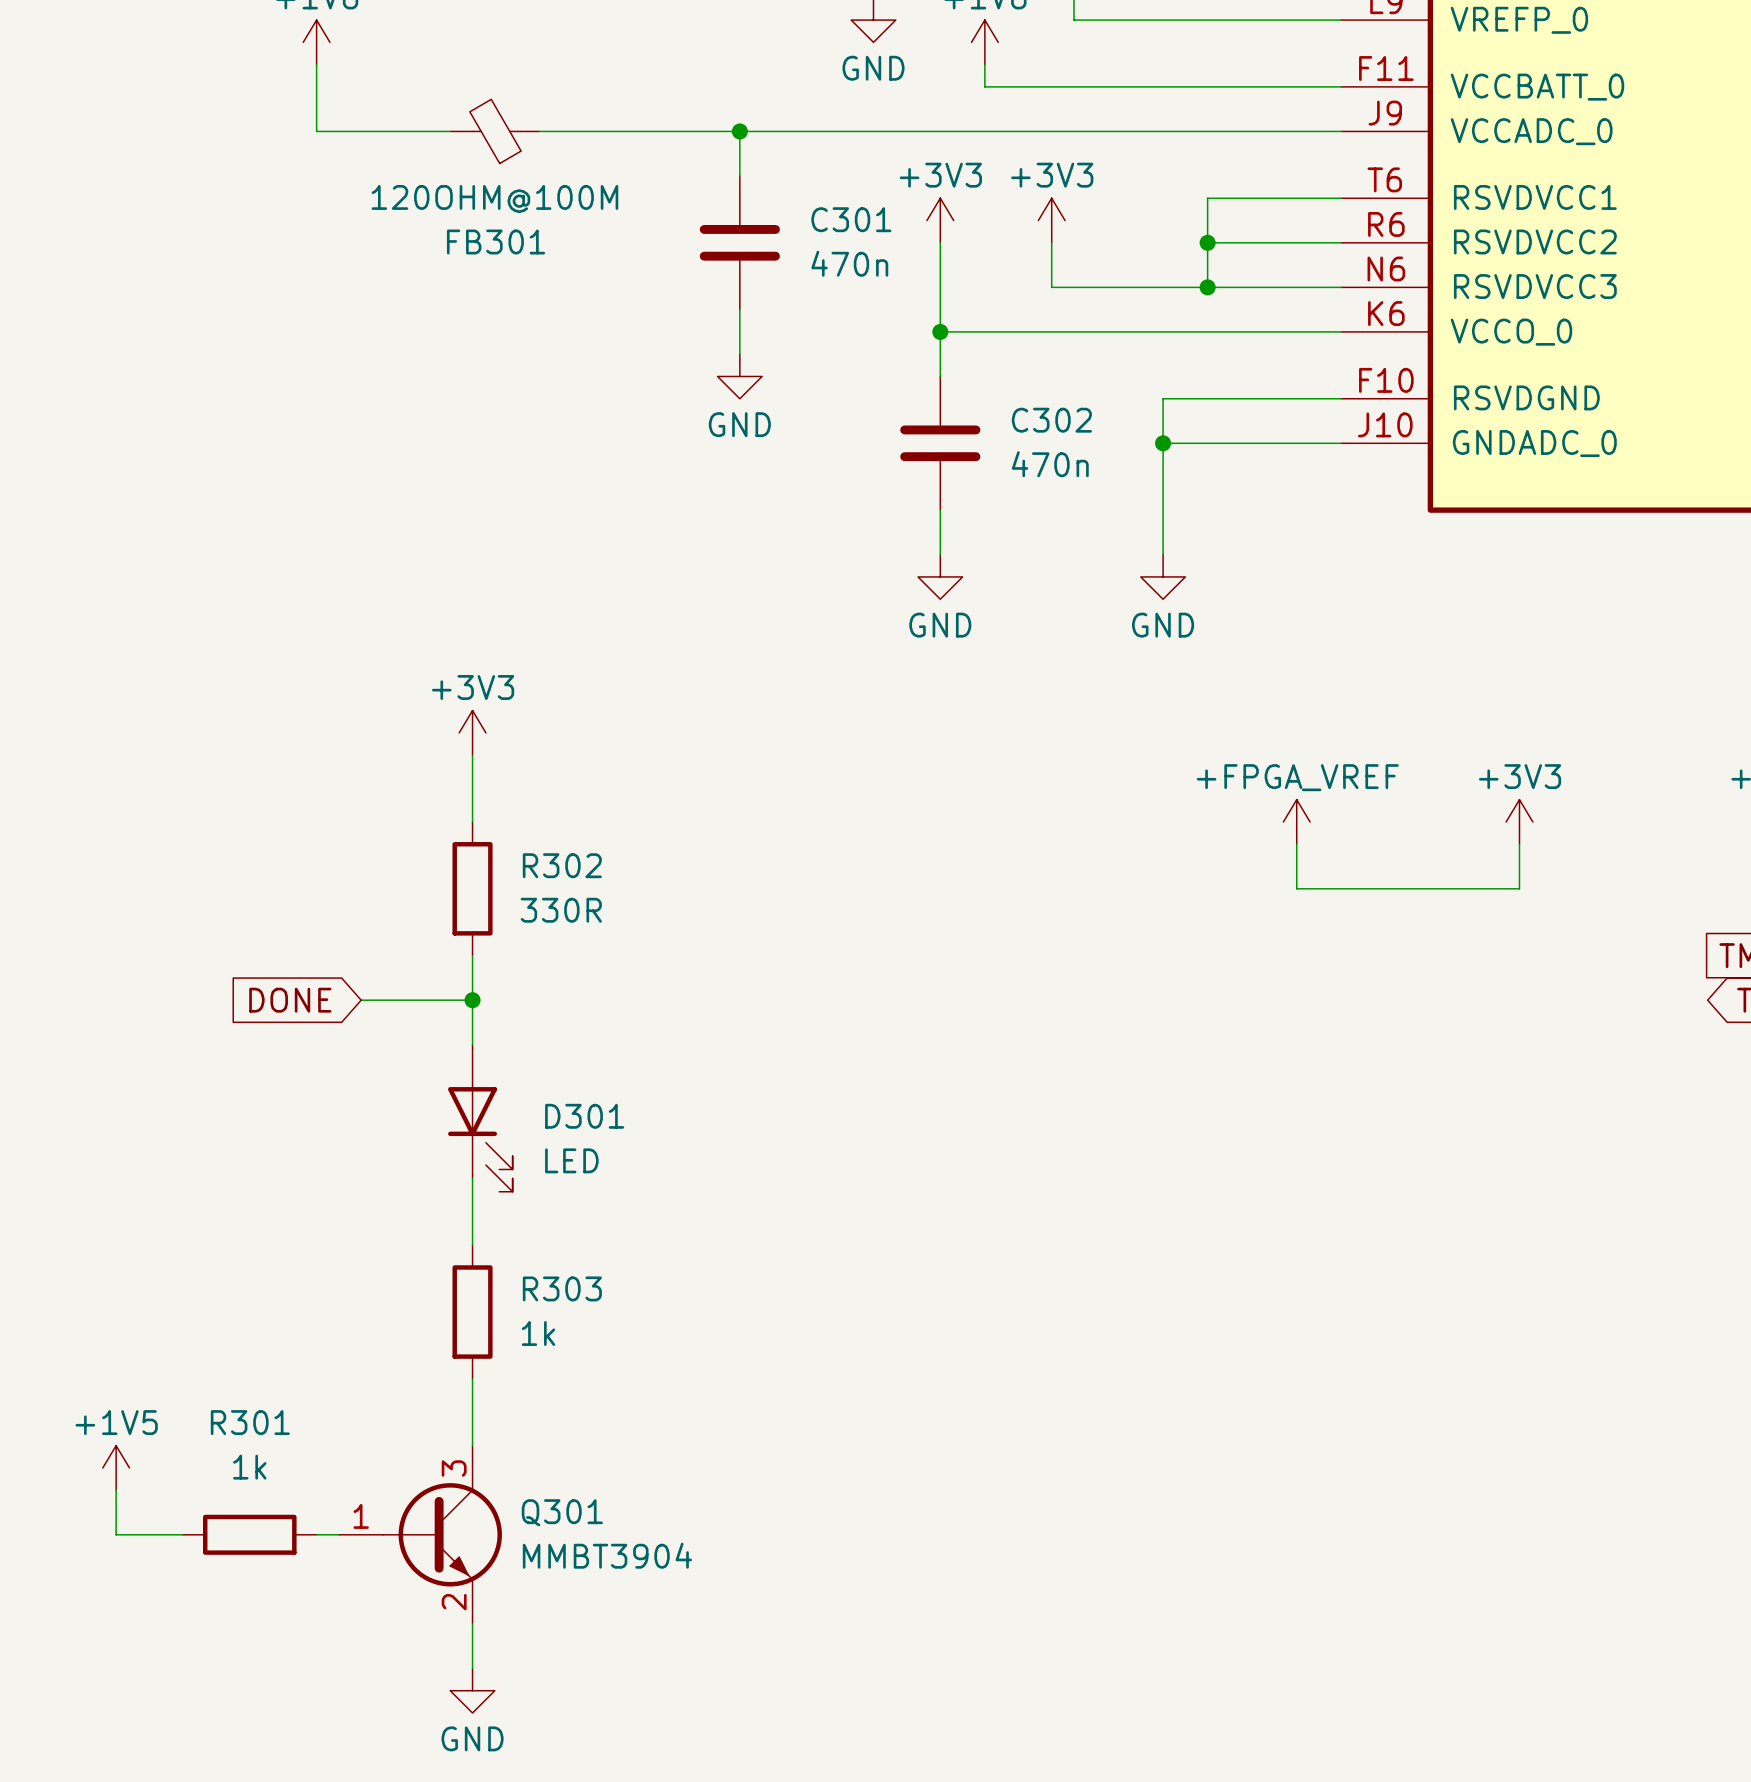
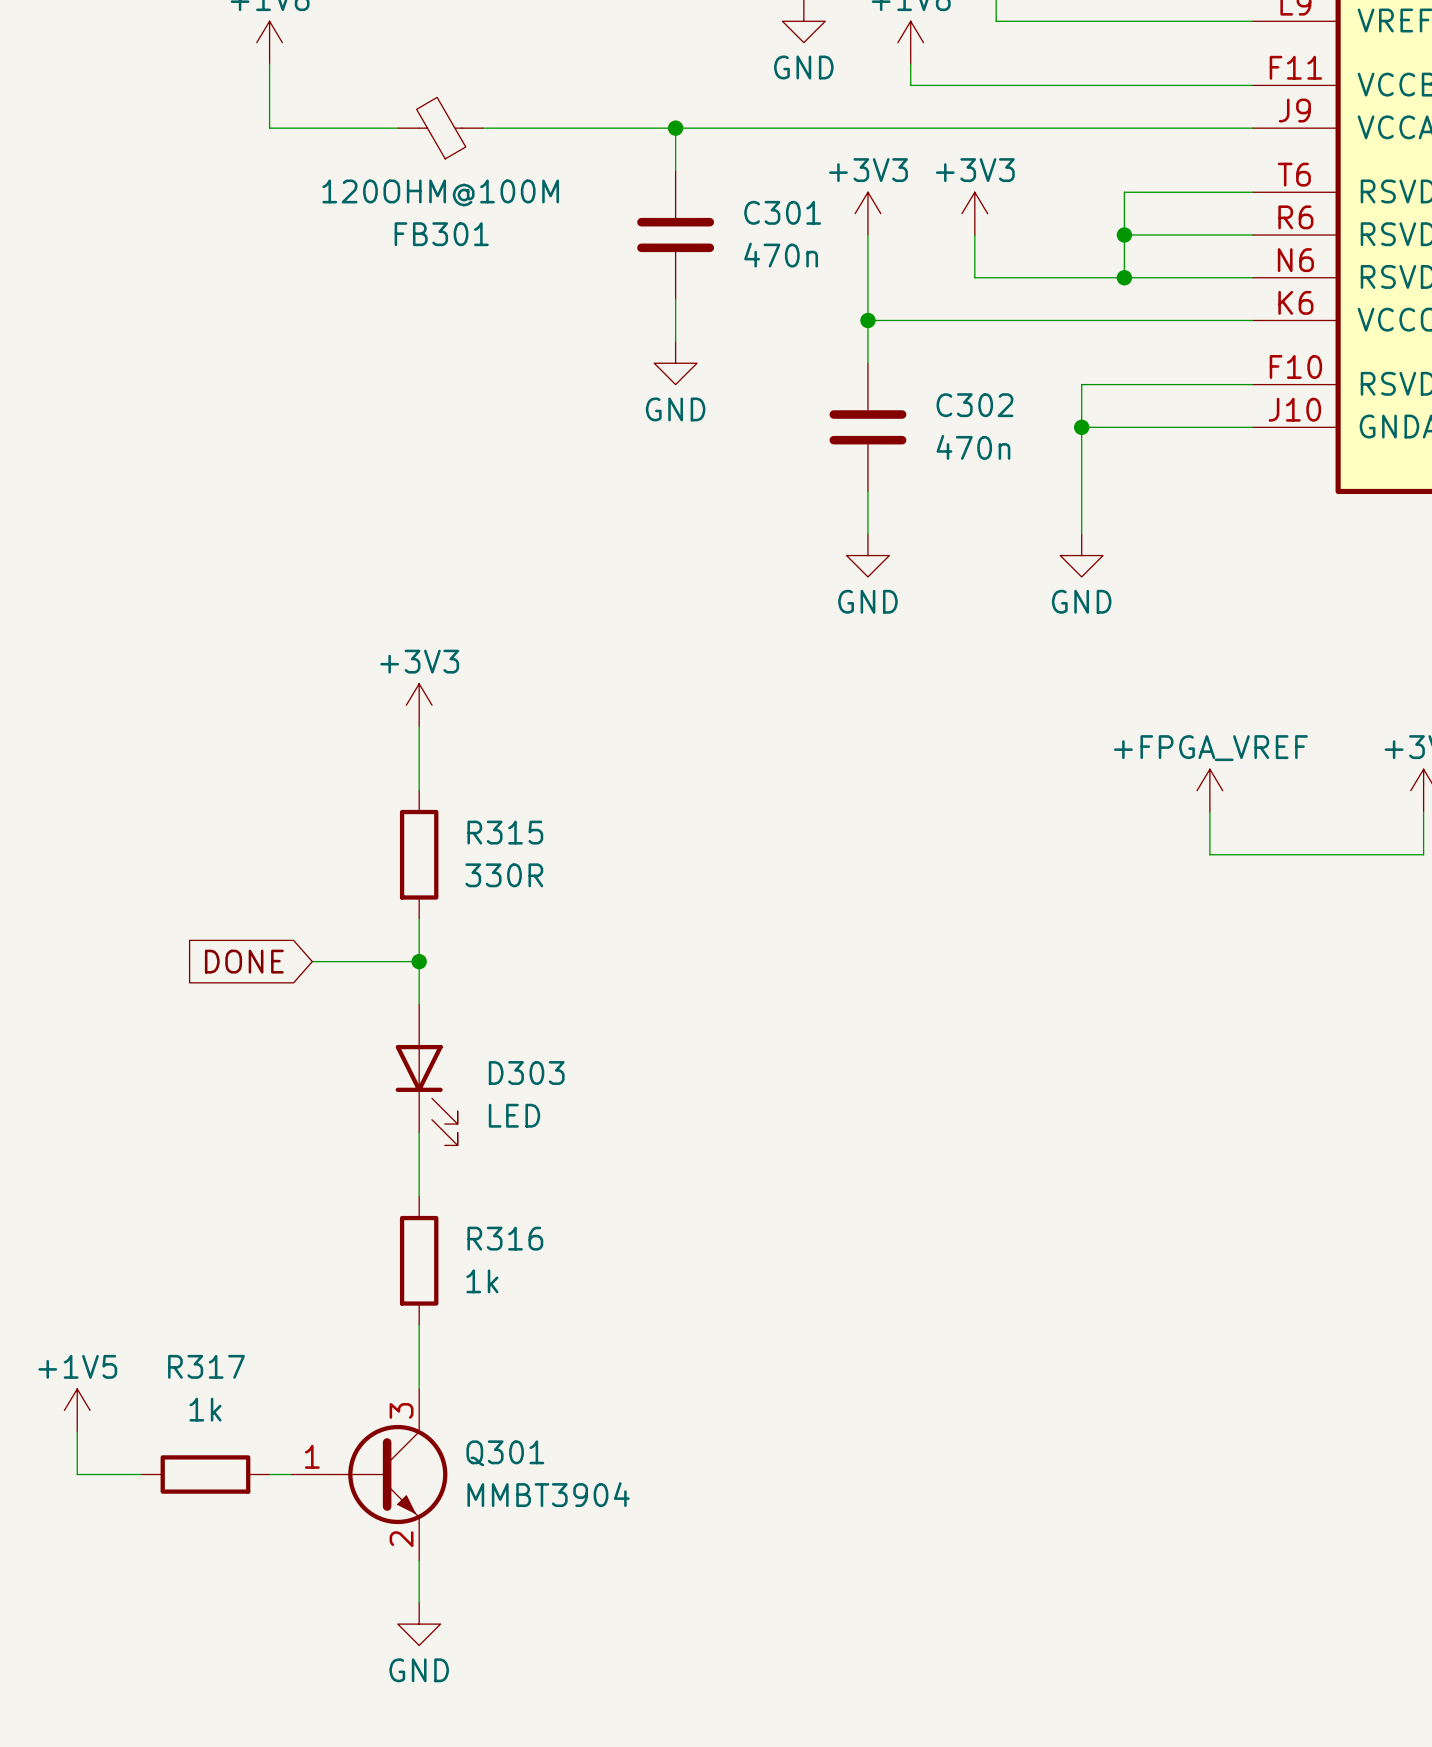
R302 name: R302 (562, 865) -> R315 (505, 832)
D301 name: D301 (584, 1116) -> D303 (526, 1073)
R303 name: R303 (562, 1288) -> R316 (505, 1238)
R301 name: R301 (250, 1422) -> R317 (206, 1366)

